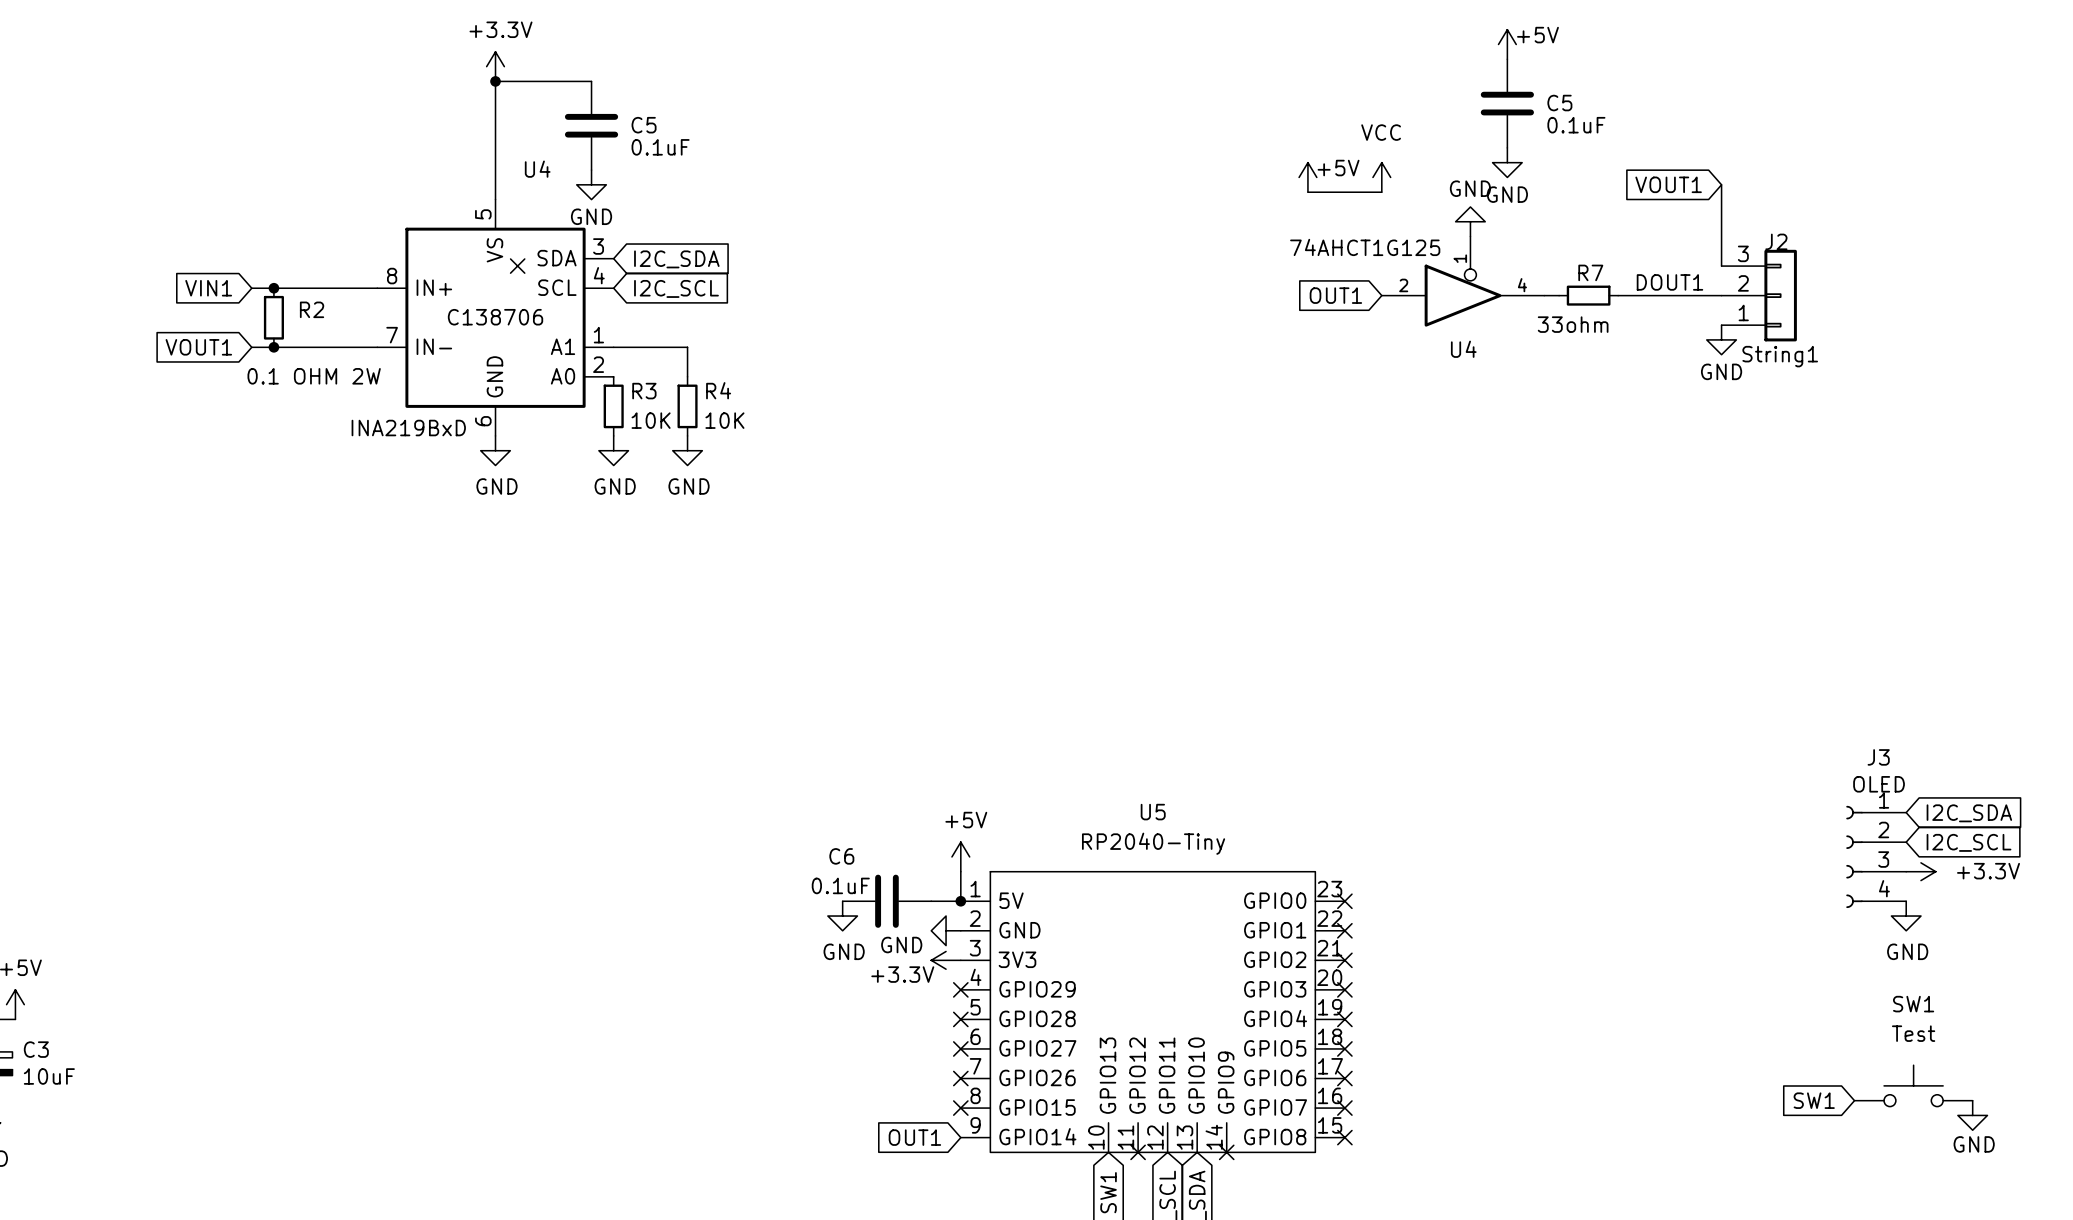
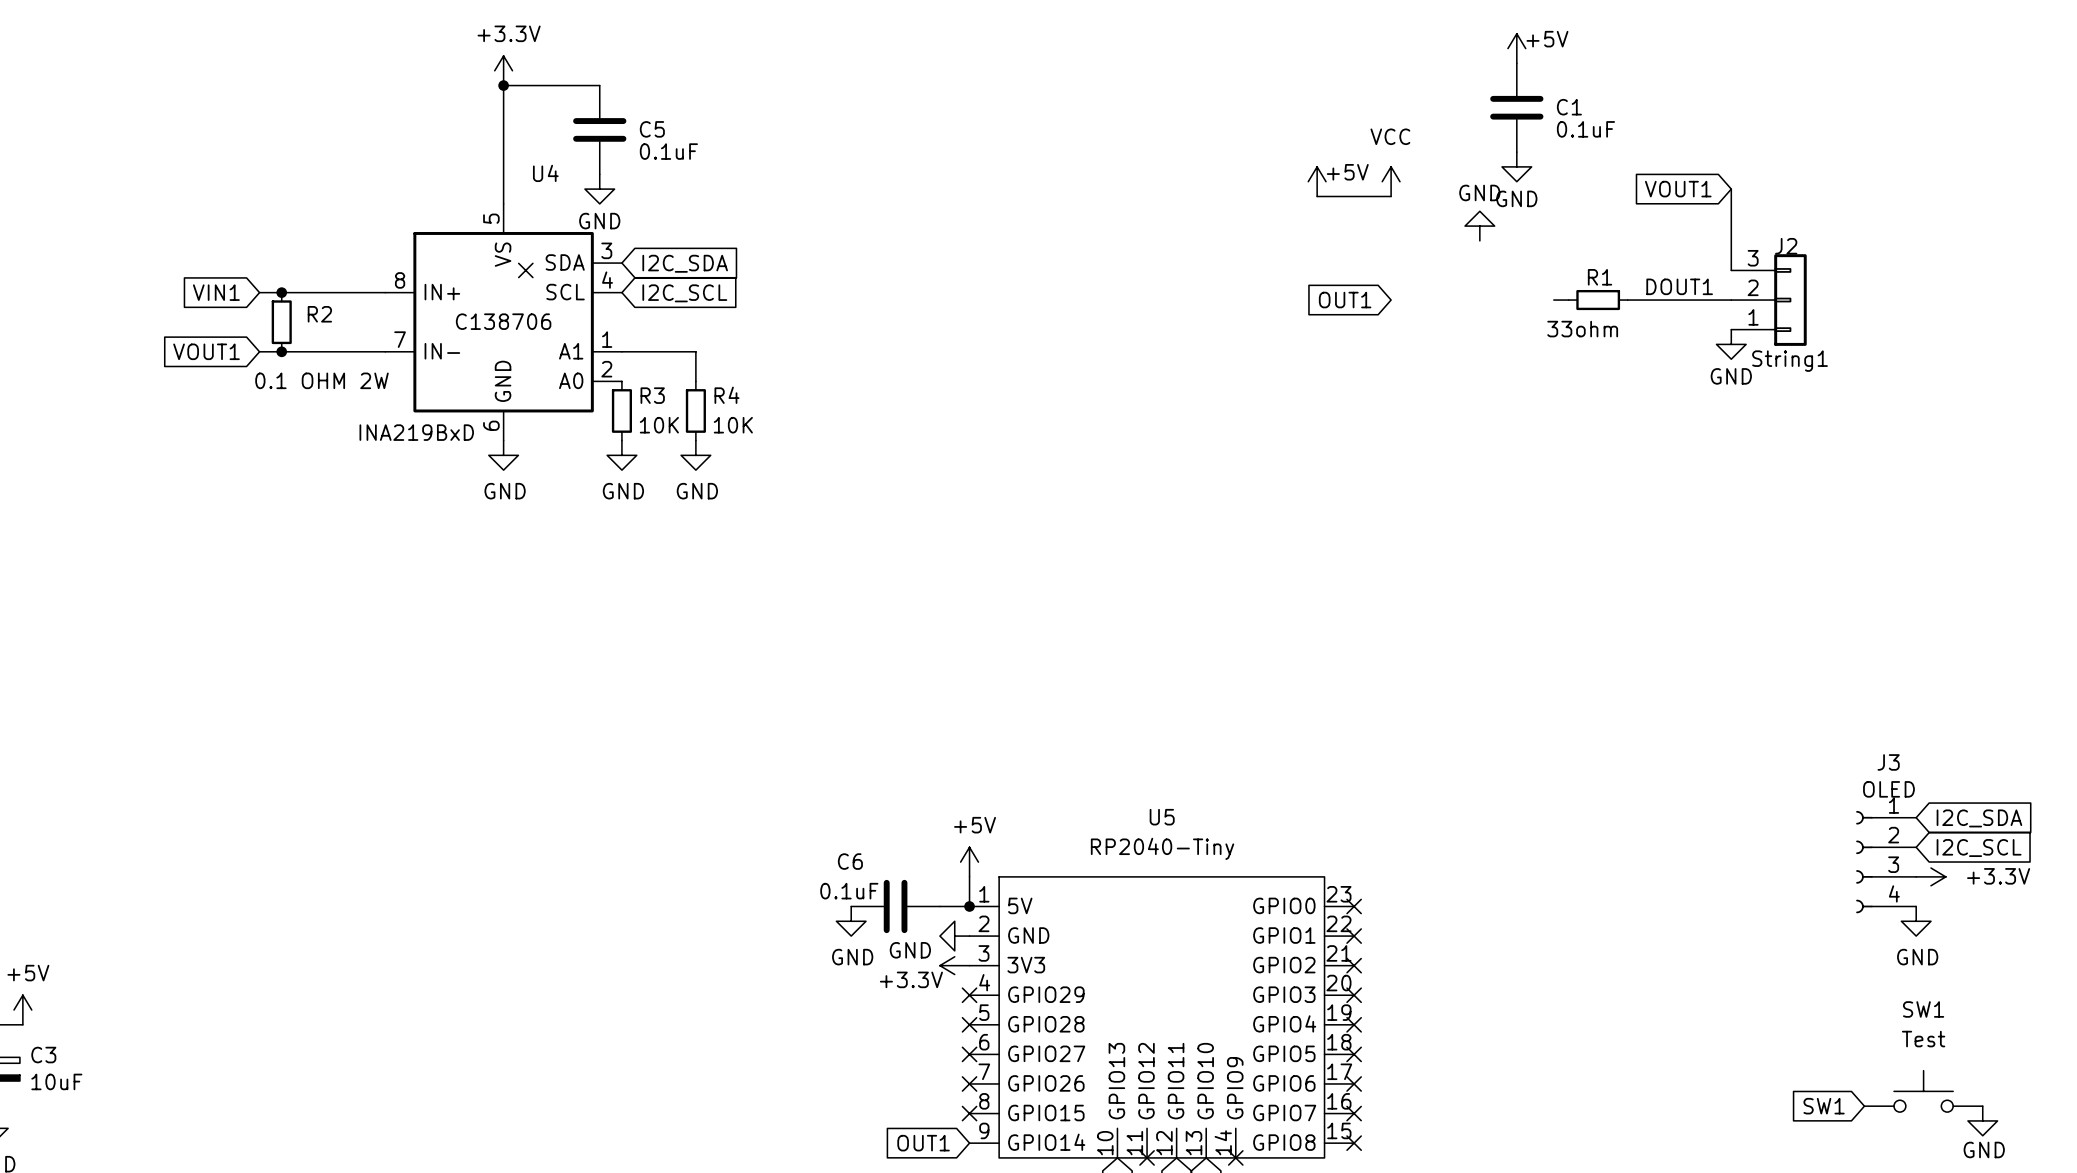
C5 name: C5 (1559, 103) -> C1 (1569, 107)
R7 name: R7 (1590, 272) -> R1 (1600, 277)
U4: 74AHCT1G125 (1463, 281) -> none

